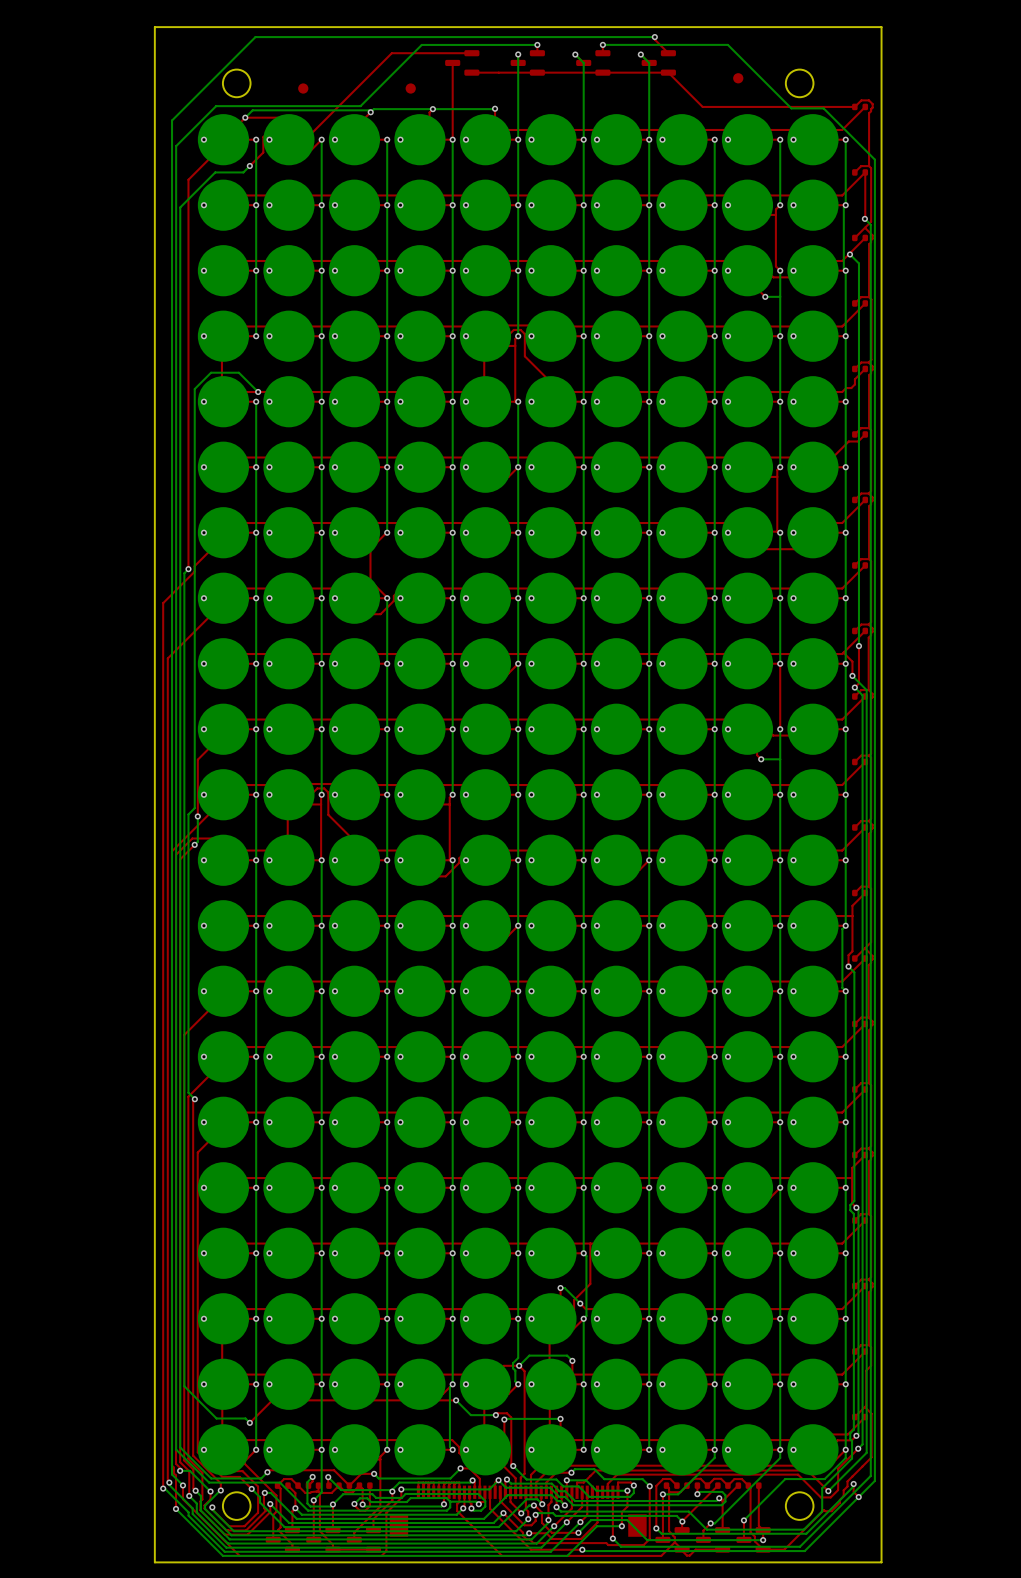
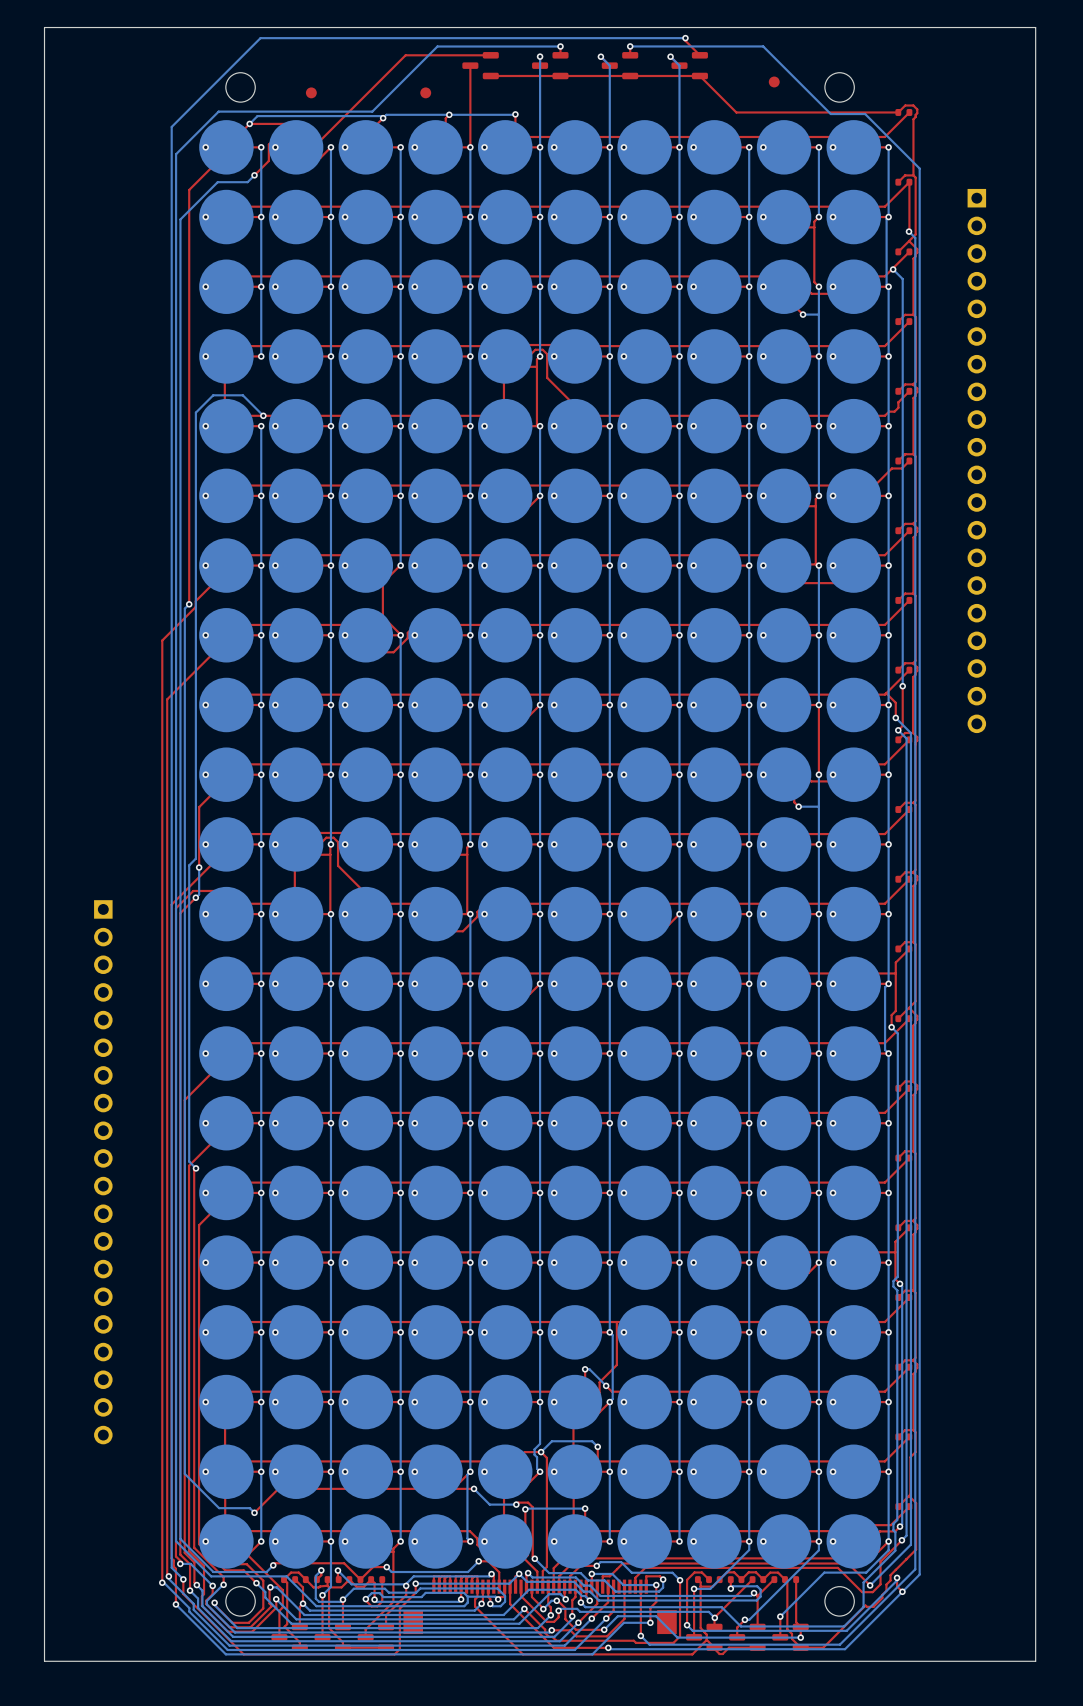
board edge: (154, 27) (154, 1562) -> (153, 27) (44, 27) (44, 1661) (153, 1661)
board edge: (881, 27) (881, 1562) -> (926, 27) (1035, 27) (1035, 1661) (926, 1661)
part: none -> (976, 461)
part: none -> (103, 1172)

